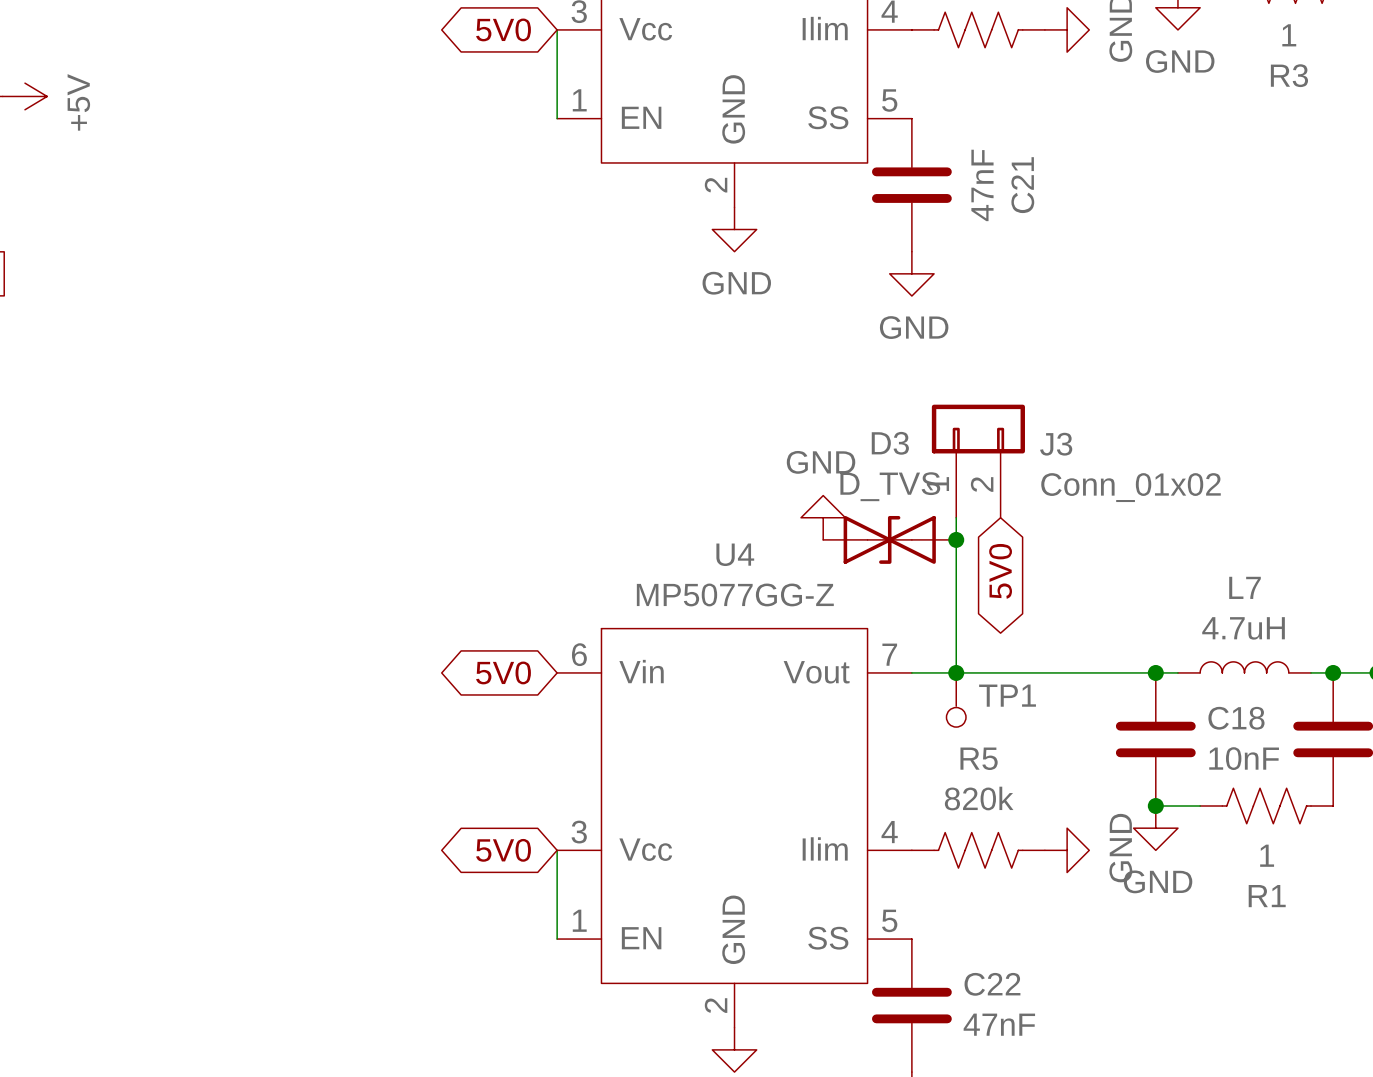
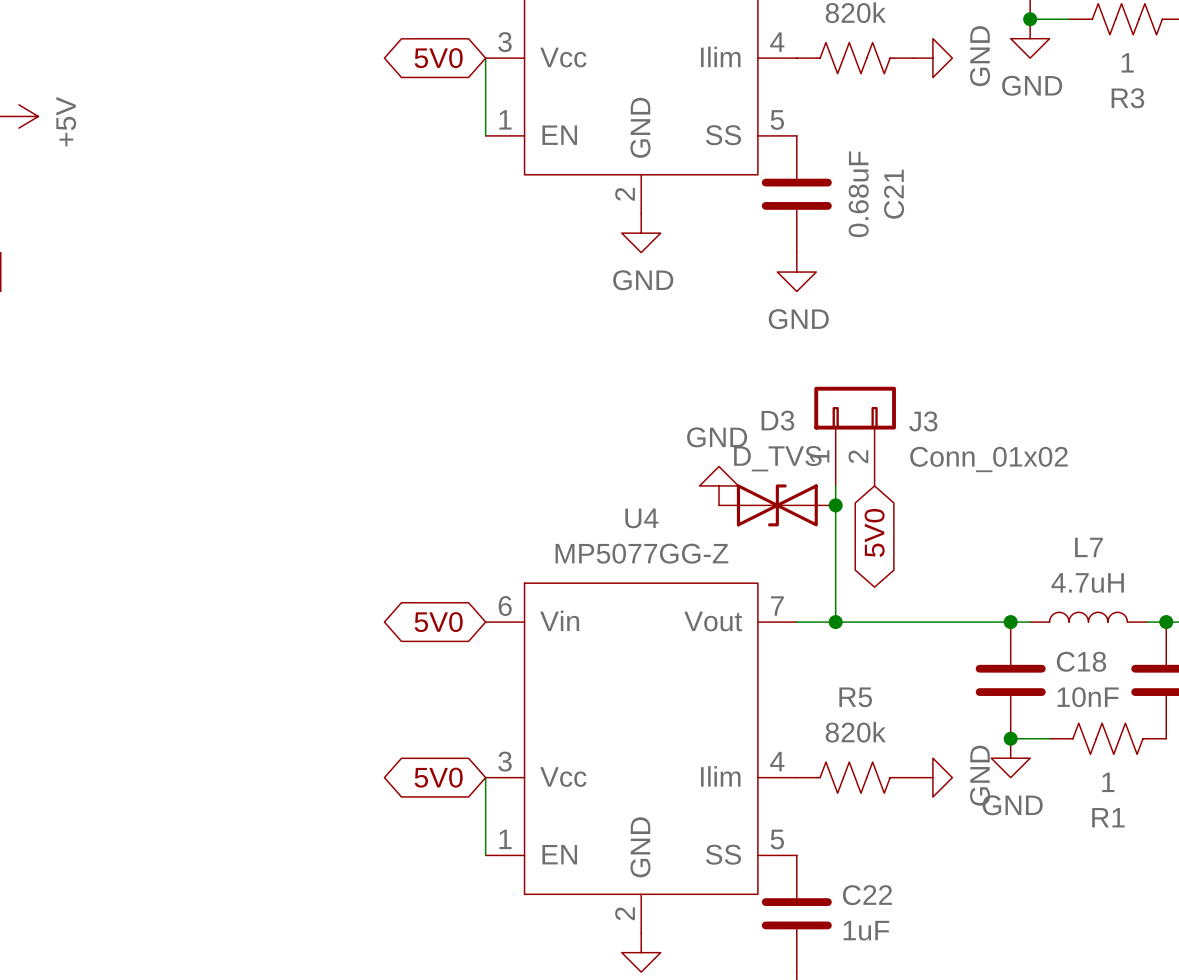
C21 value: 47nF (982, 185) -> 0.68uF (858, 194)
TP1: (956, 700) -> none
C22 value: 47nF (999, 1024) -> 1uF (866, 930)

